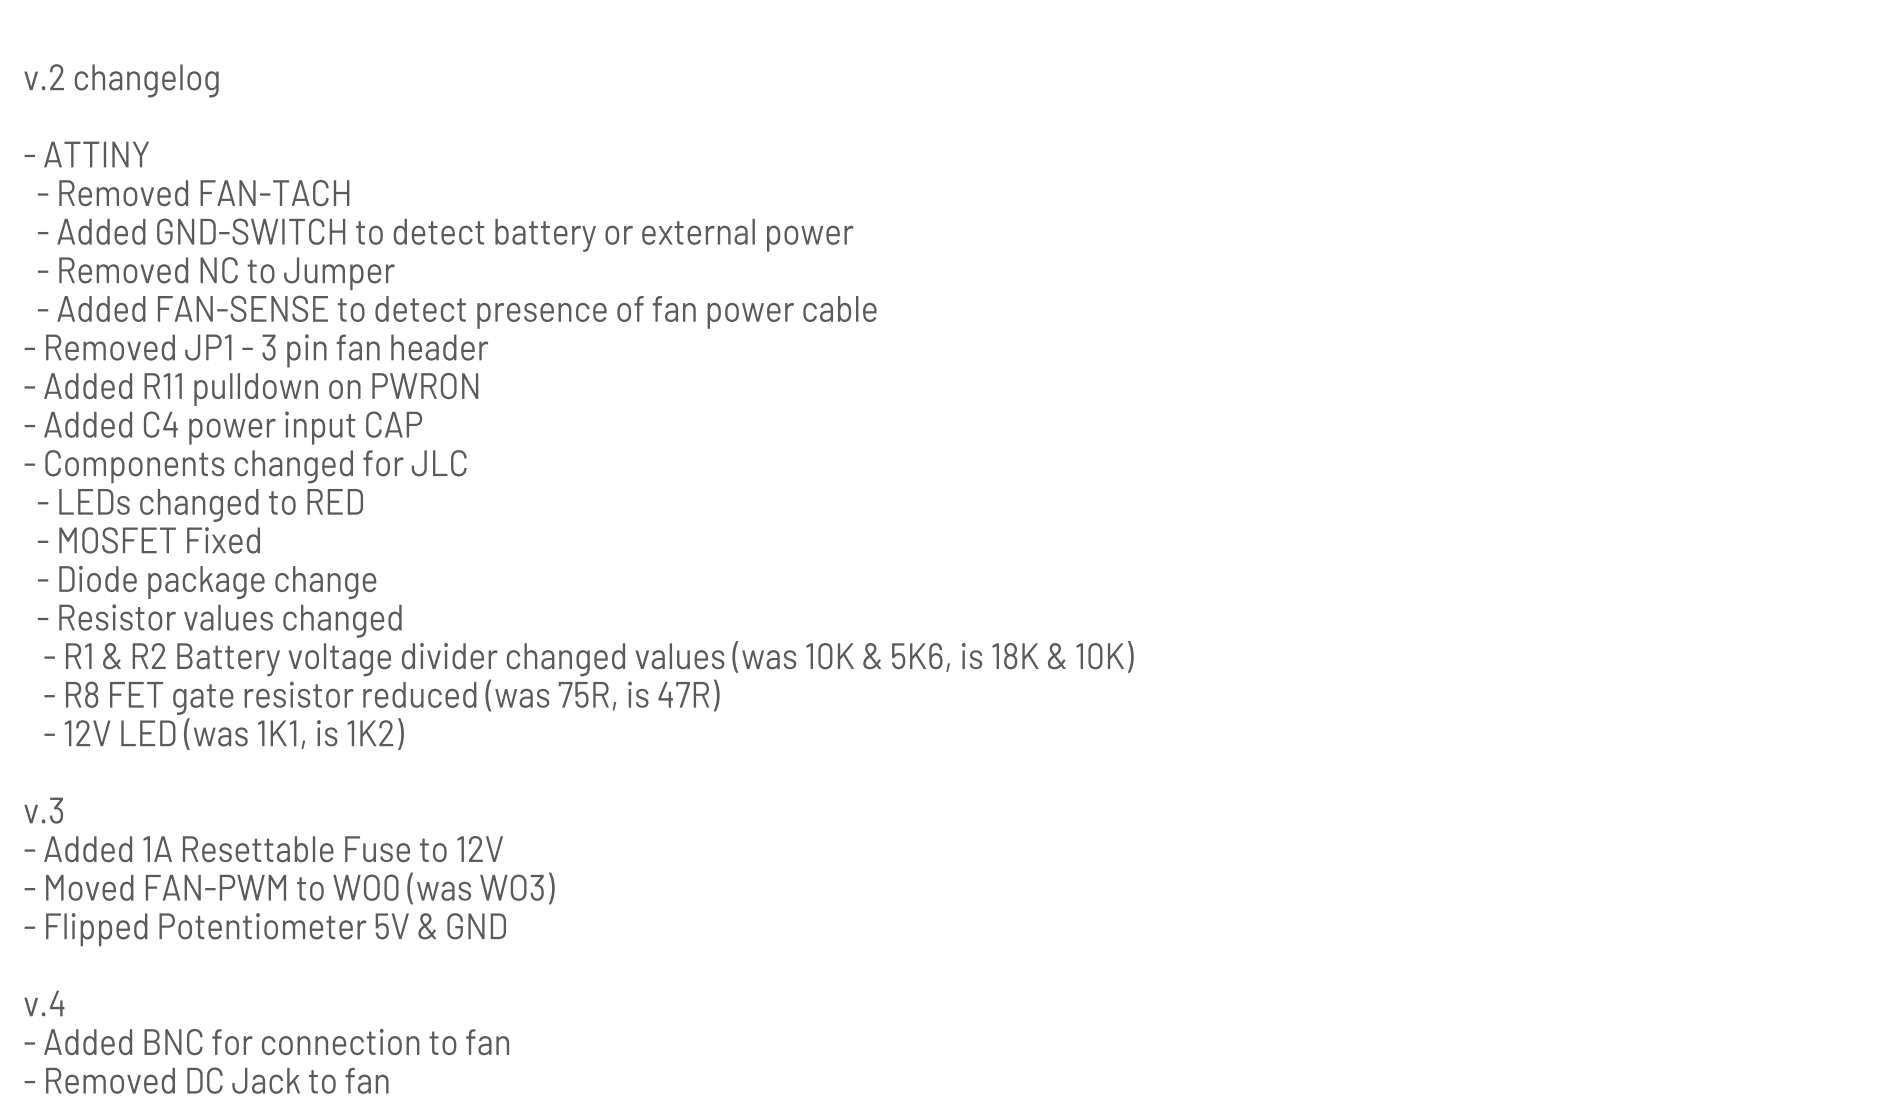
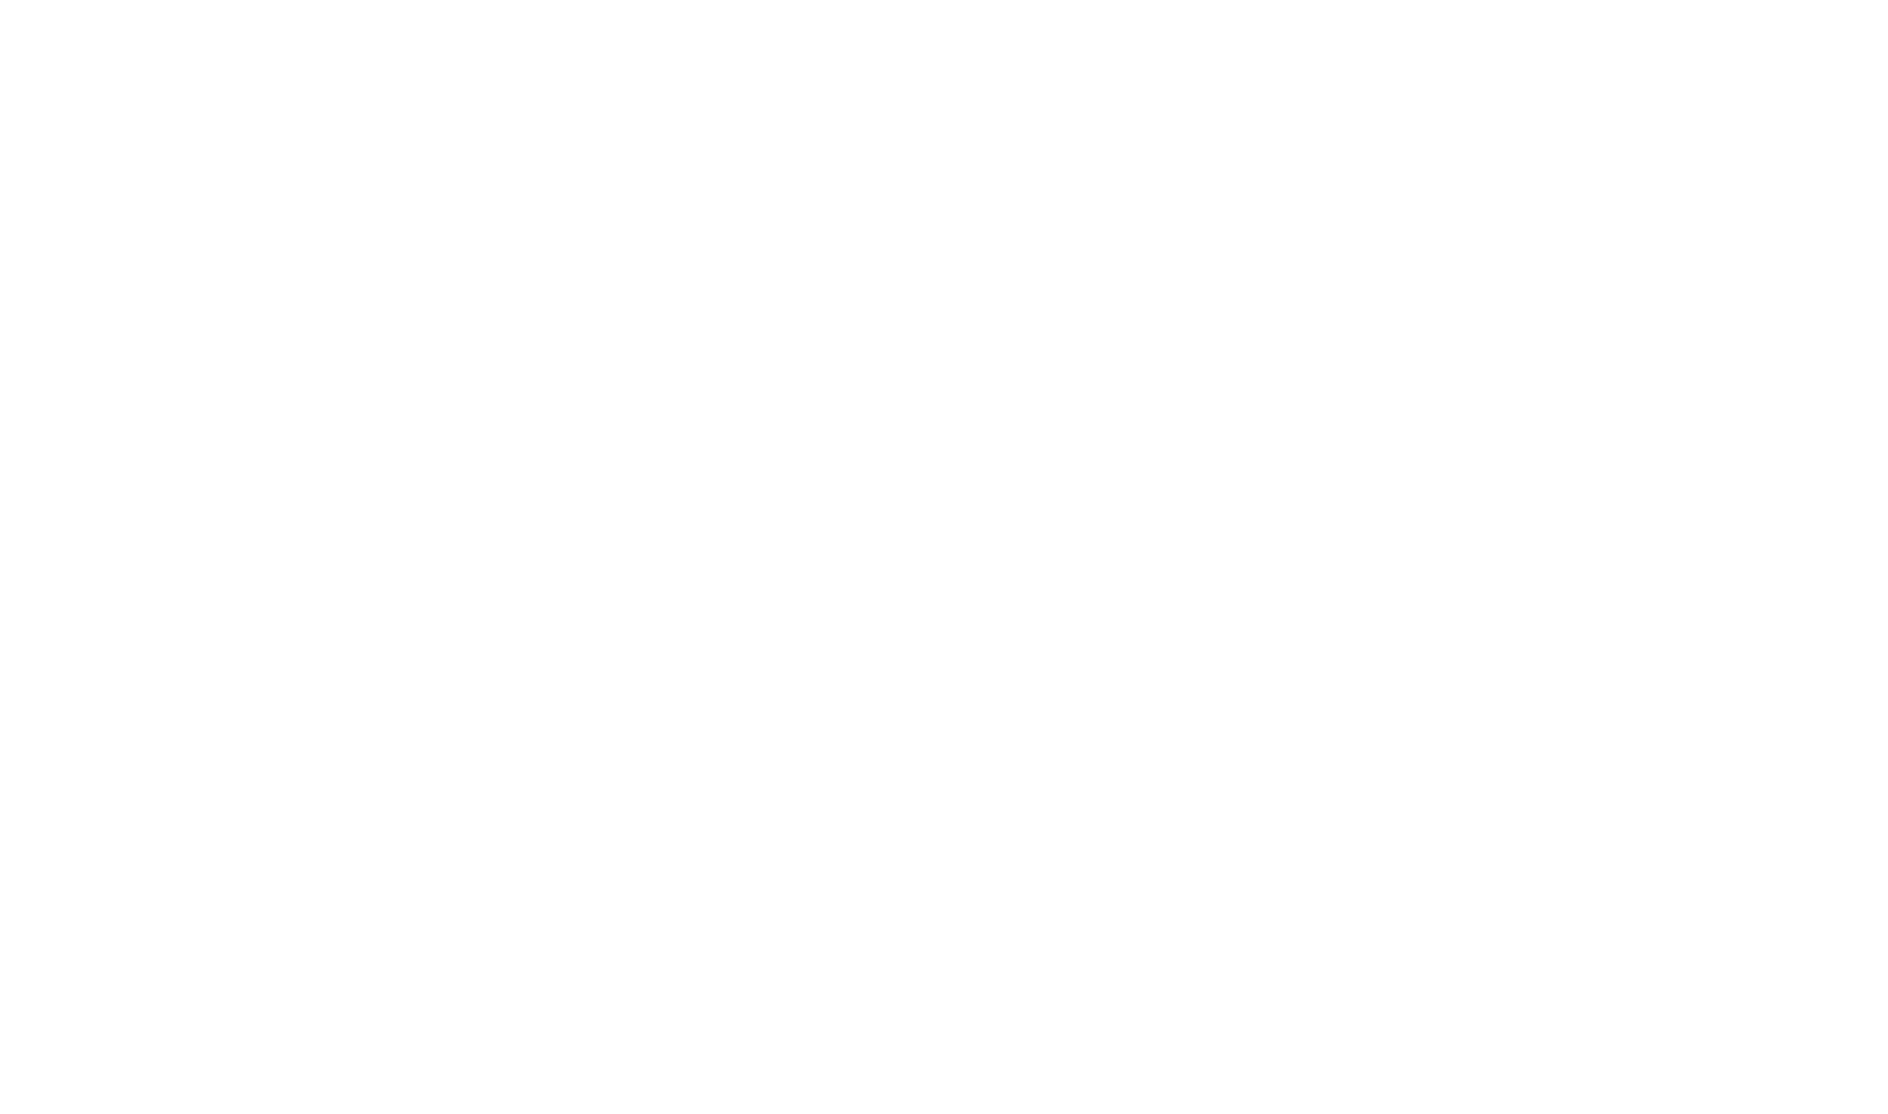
text: v.2 changelog (121, 80) -> none
text: - ATTINY (86, 154) -> none
text: - Removed FAN-TACH (193, 193) -> none
text: - Added GND-SWITCH to detect battery or external power (445, 235) -> none
text: - Removed NC to Jumper (216, 273) -> none
text: - Added FAN-SENSE to detect presence of fan power cable (457, 312) -> none
text: - Removed JP1 - 3 pin fan header (256, 350) -> none
text: - Added R11 pulldown on PWRON (251, 389) -> none
text: - Added C4 power input CAP (223, 428) -> none
text: - Components changed for JLC (245, 466) -> none
text: - LEDs changed to RED (200, 505) -> none
text: - MOSFET Fixed (148, 540) -> none
text: - Diode package change (207, 582) -> none
text: - Resistor values changed (219, 621) -> none
text: - R1 & R2 Battery voltage divider changed values (was 10K & 5K6, is 18K & 10K) (589, 658) -> none
text: - R8 FET gate resistor reduced (was 75R, is 47R) (382, 697) -> none
text: - 12V LED (was 1K1, is 1K2) (224, 734) -> none
text: v.3 (43, 810) -> none
text: - Added 1A Resettable Fuse to 12V (263, 849) -> none
text: - Moved FAN-PWM to WO0 (was WO3) (289, 888) -> none
text: - Flipped Potentiometer 5V & GND (265, 929) -> none
text: v.4 (44, 1003) -> none
text: - Added BNC for connection to fan (266, 1042) -> none
text: - Removed DC Jack to fan (206, 1080) -> none

